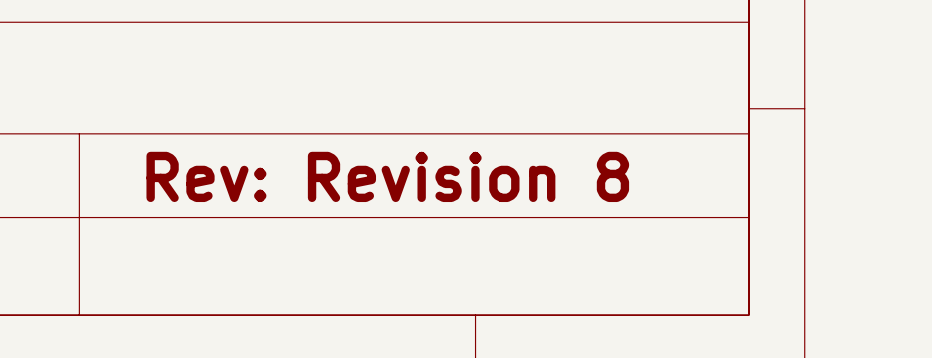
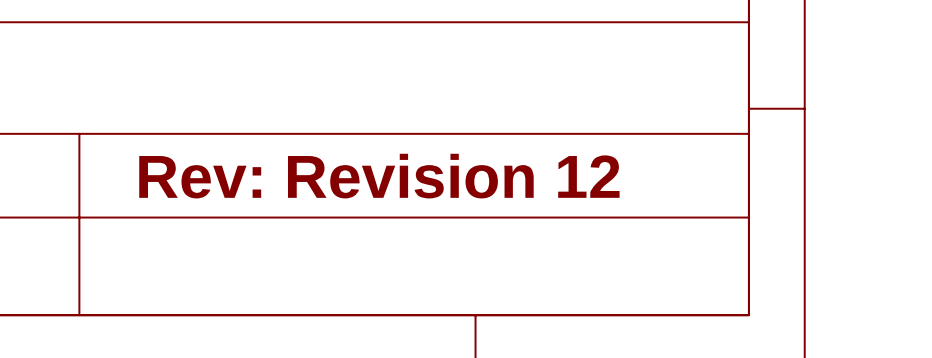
title block: Rev: Revision 8 (387, 176) -> Rev: Revision 12 (379, 176)

